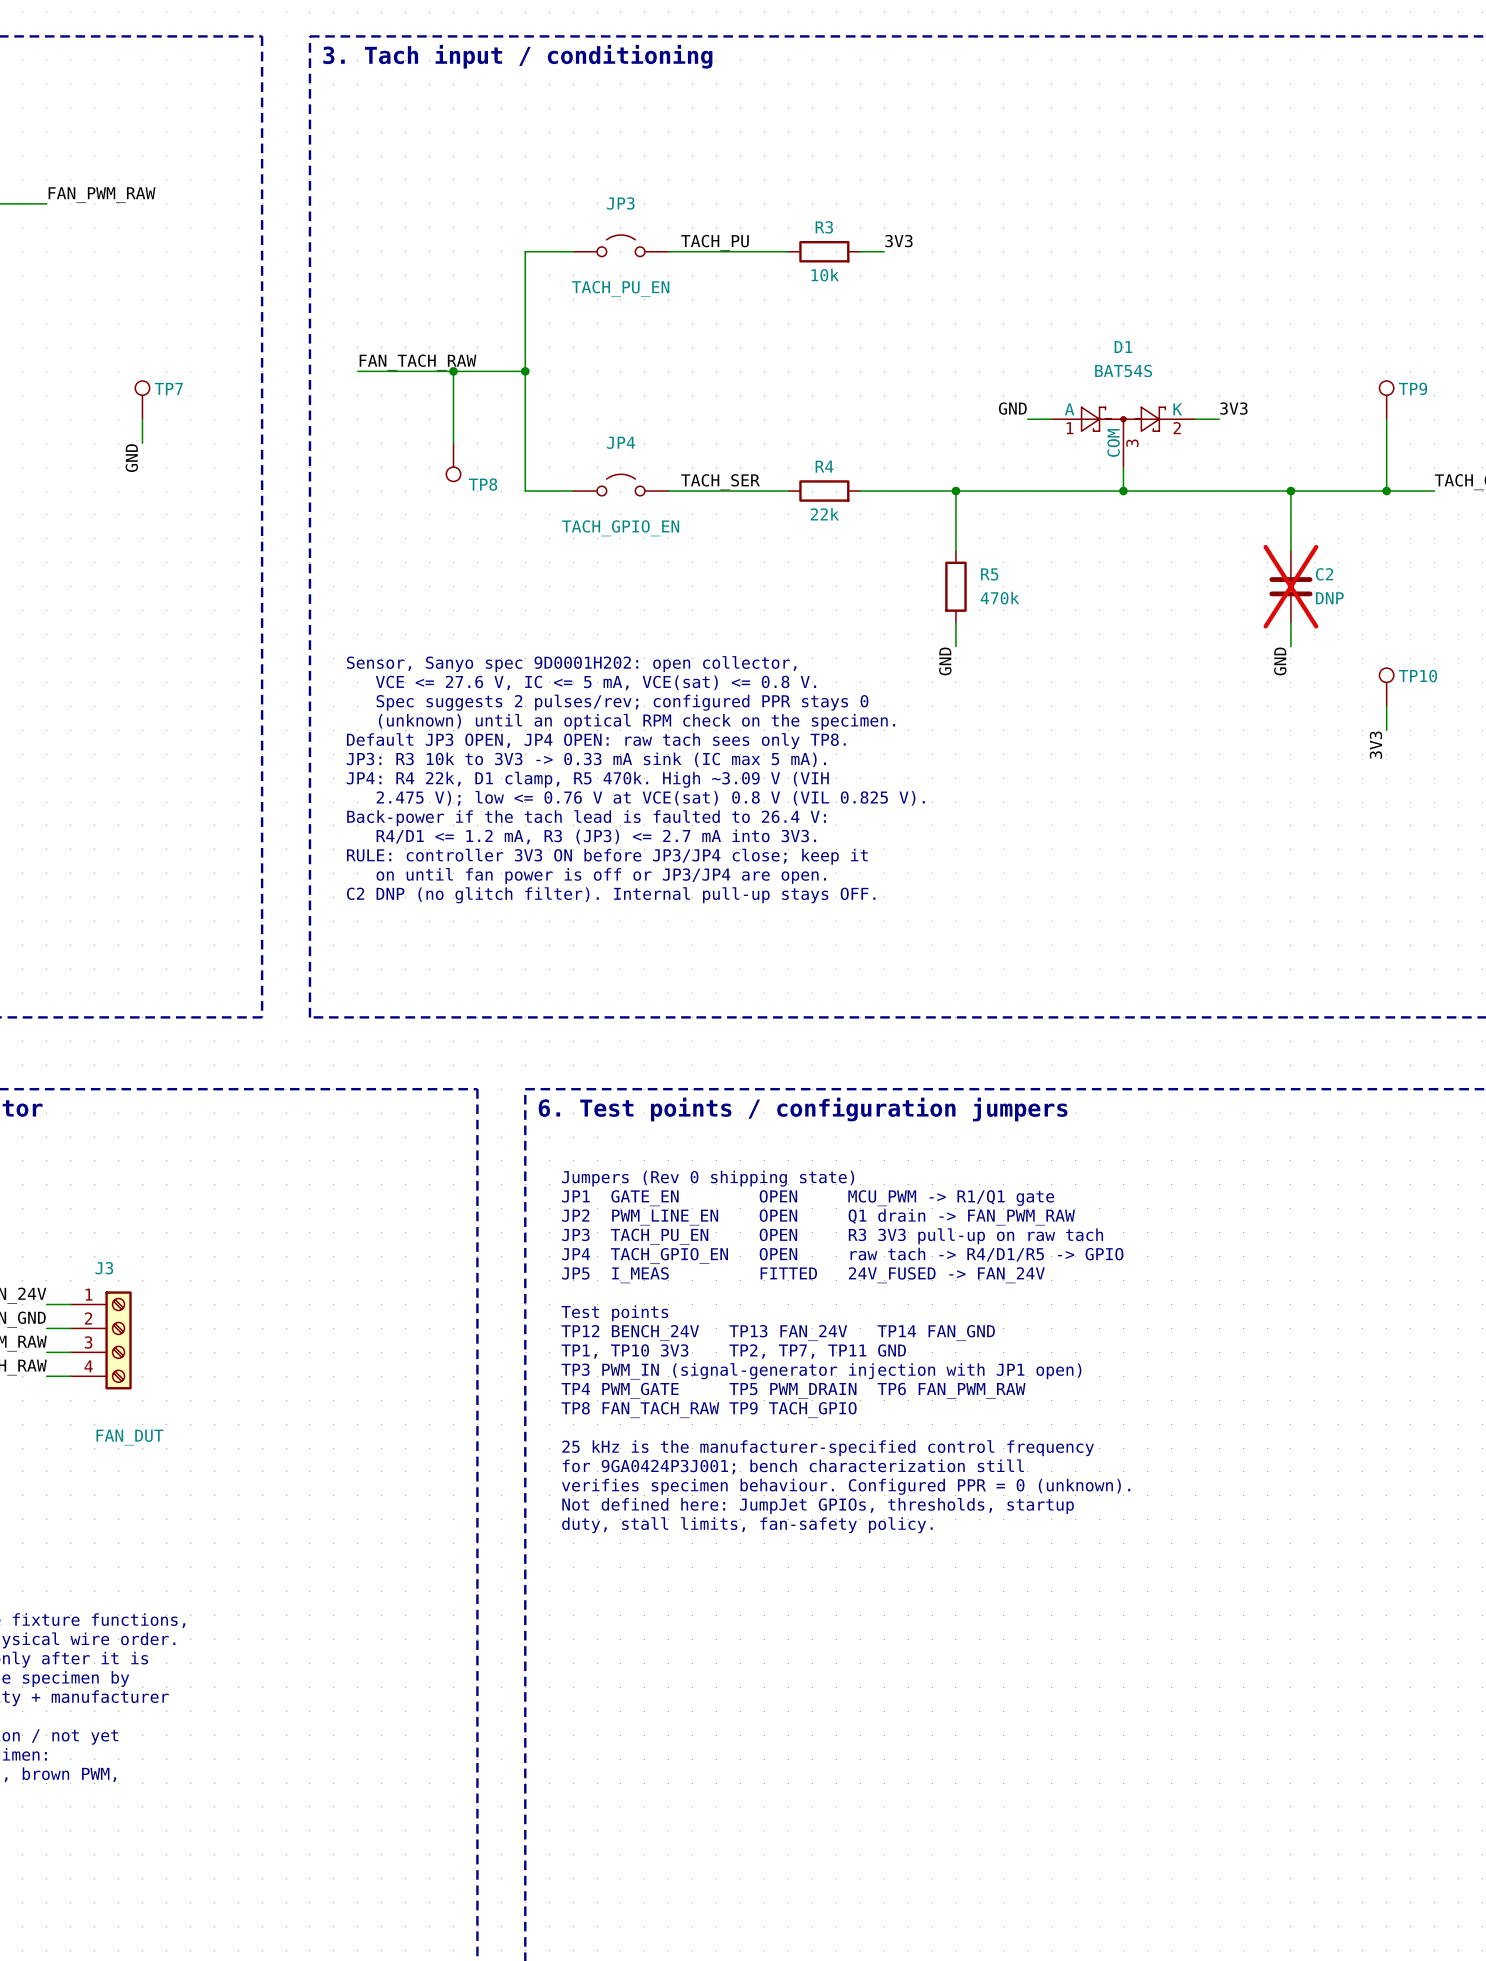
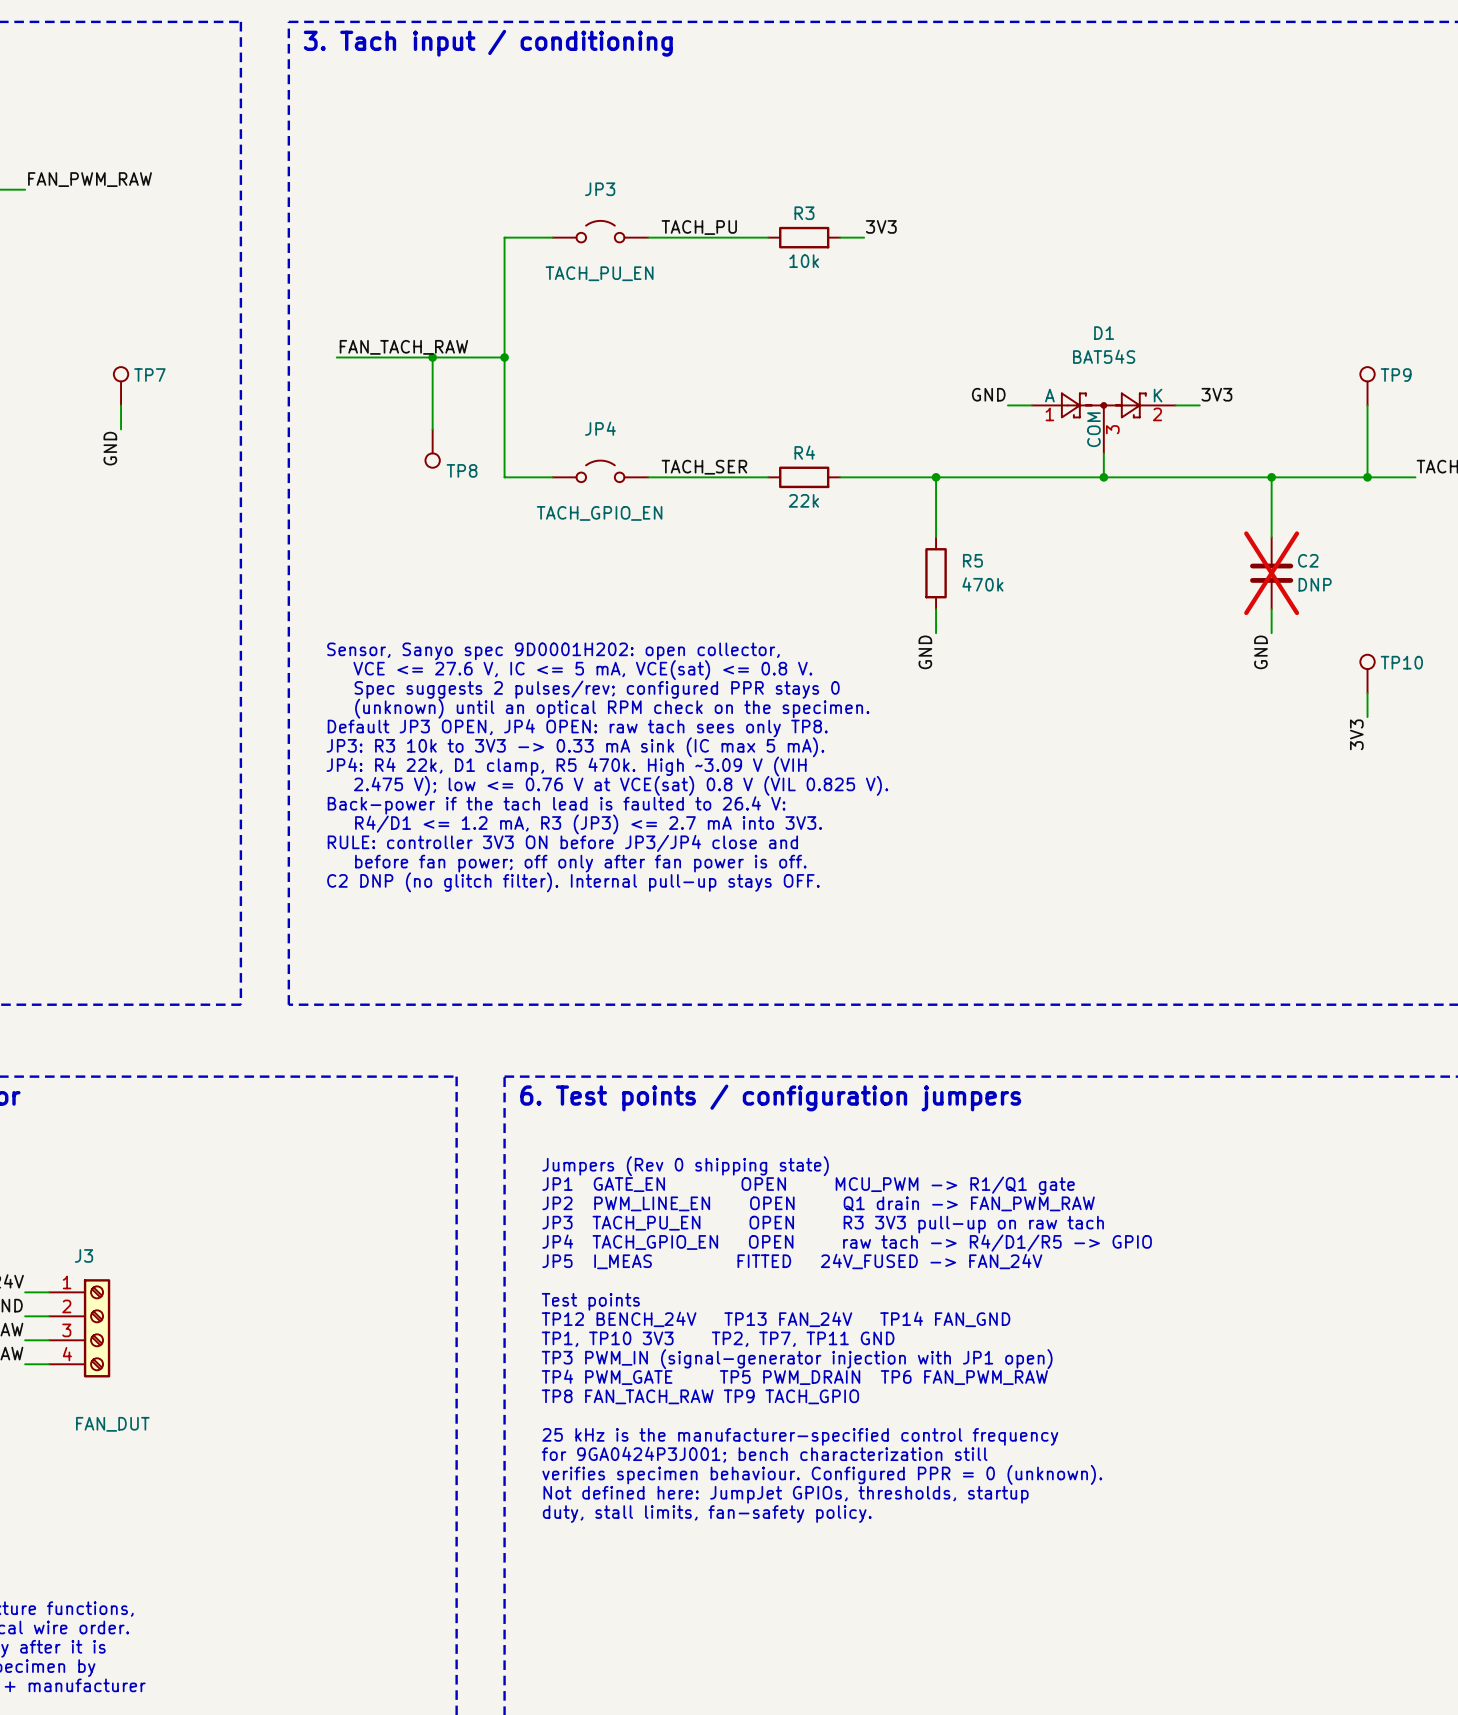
text: RULE: controller 3V3 ON before JP3/JP4 close; keep it (607, 856) -> RULE: controller 3V3 ON before JP3/JP4 close and (562, 843)
text: on until fan power is off or JP3/JP4 are open. (601, 875) -> before fan power; off only after fan power is off. (580, 863)

